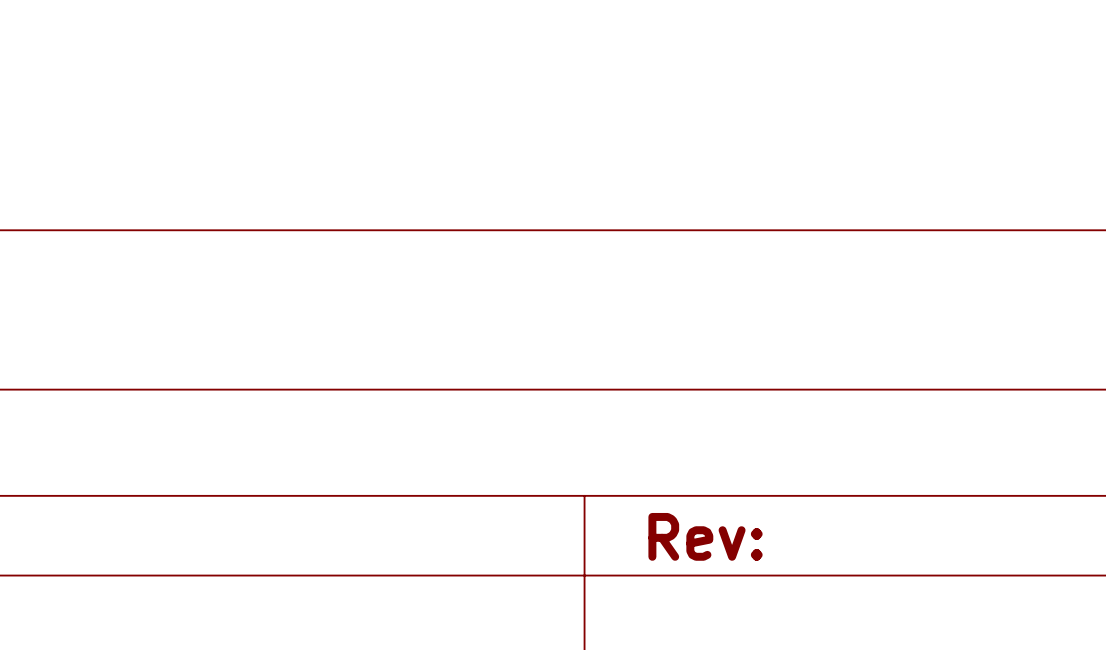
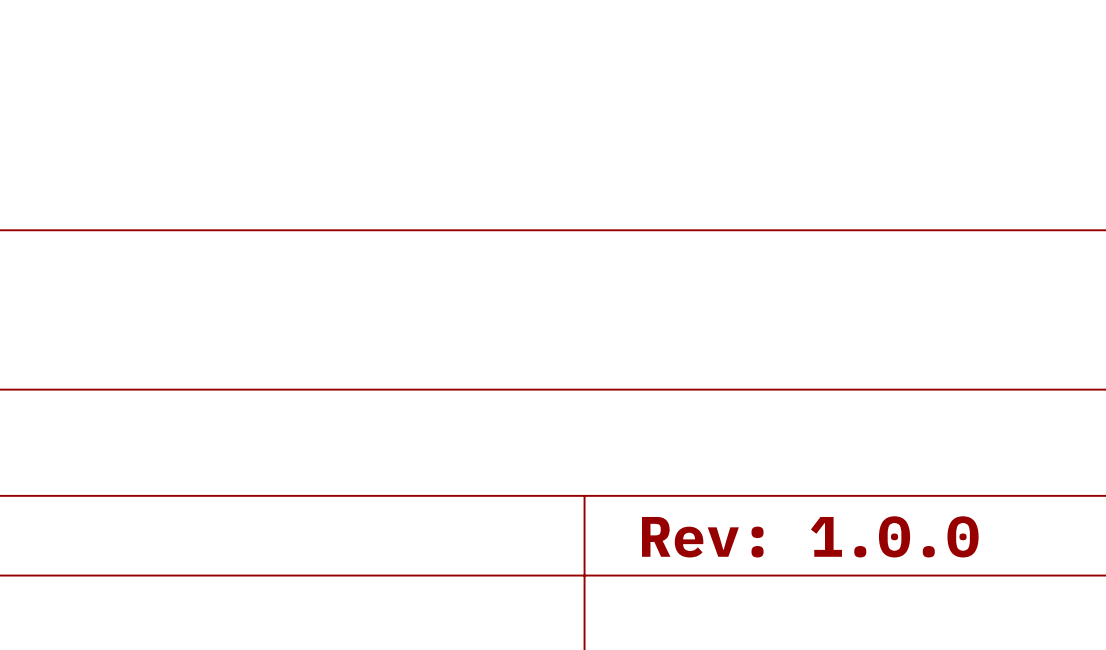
title block: Rev: (705, 536) -> Rev: 1.0.0 (810, 536)

